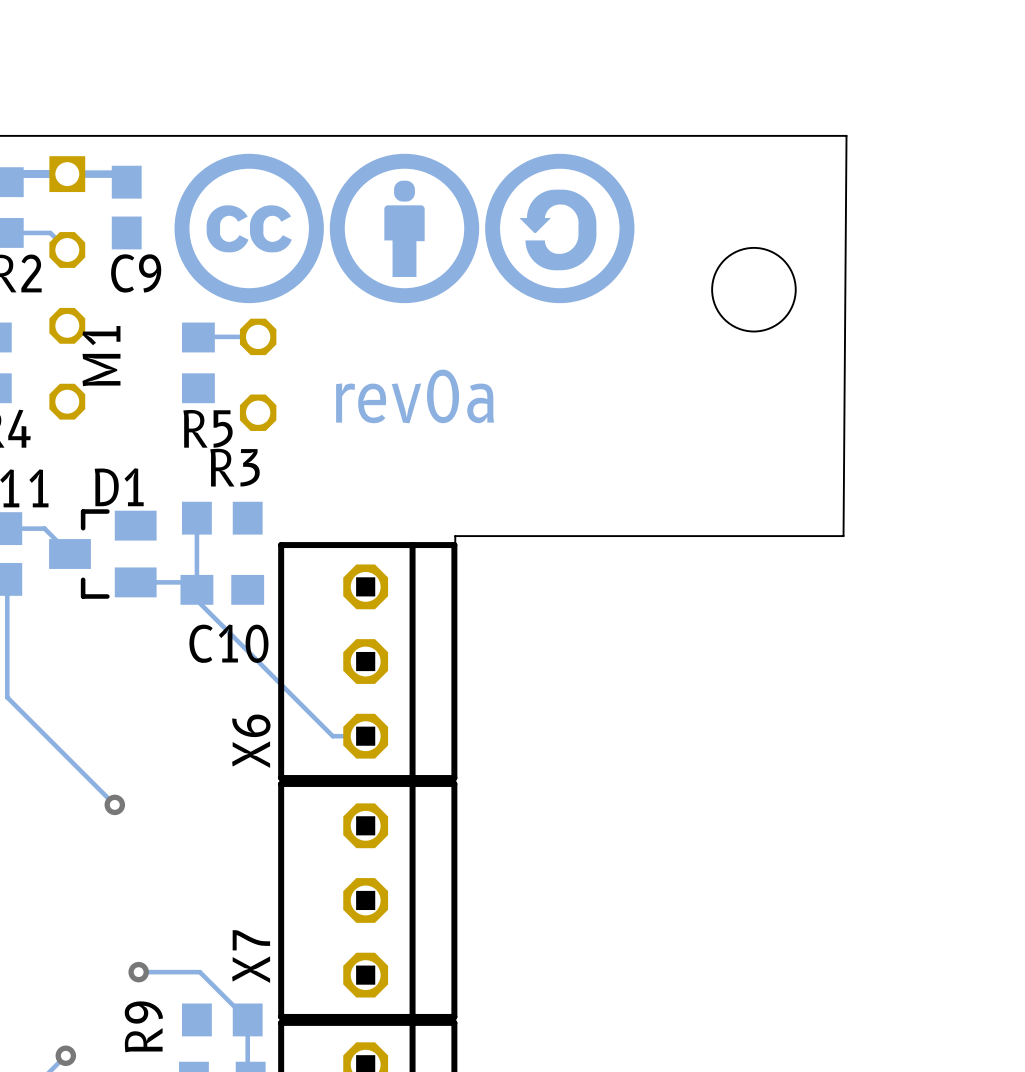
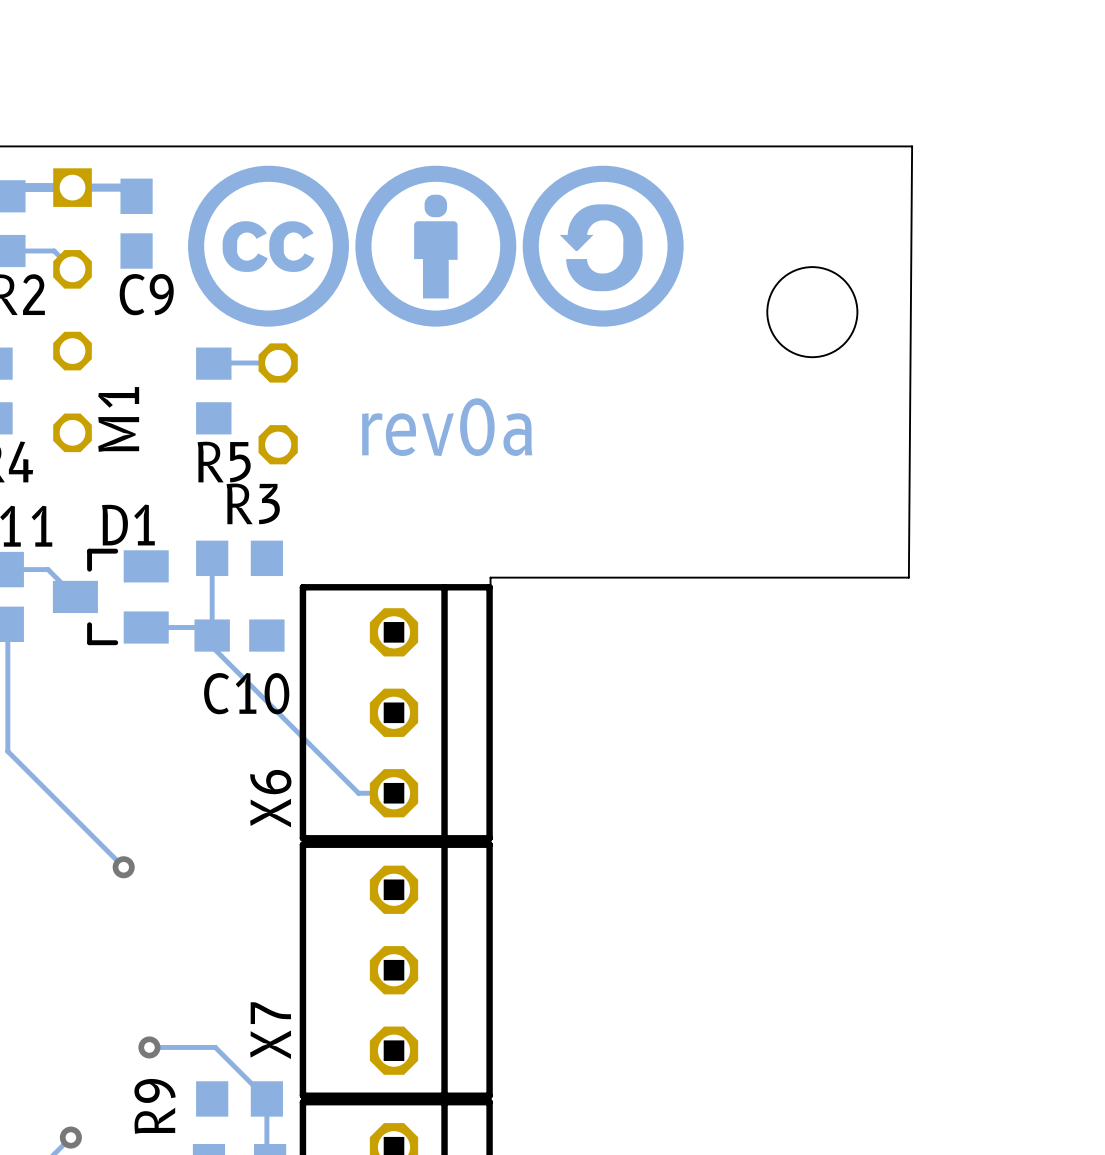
M1 name position: M1 (101, 356) -> M1 (118, 419)

